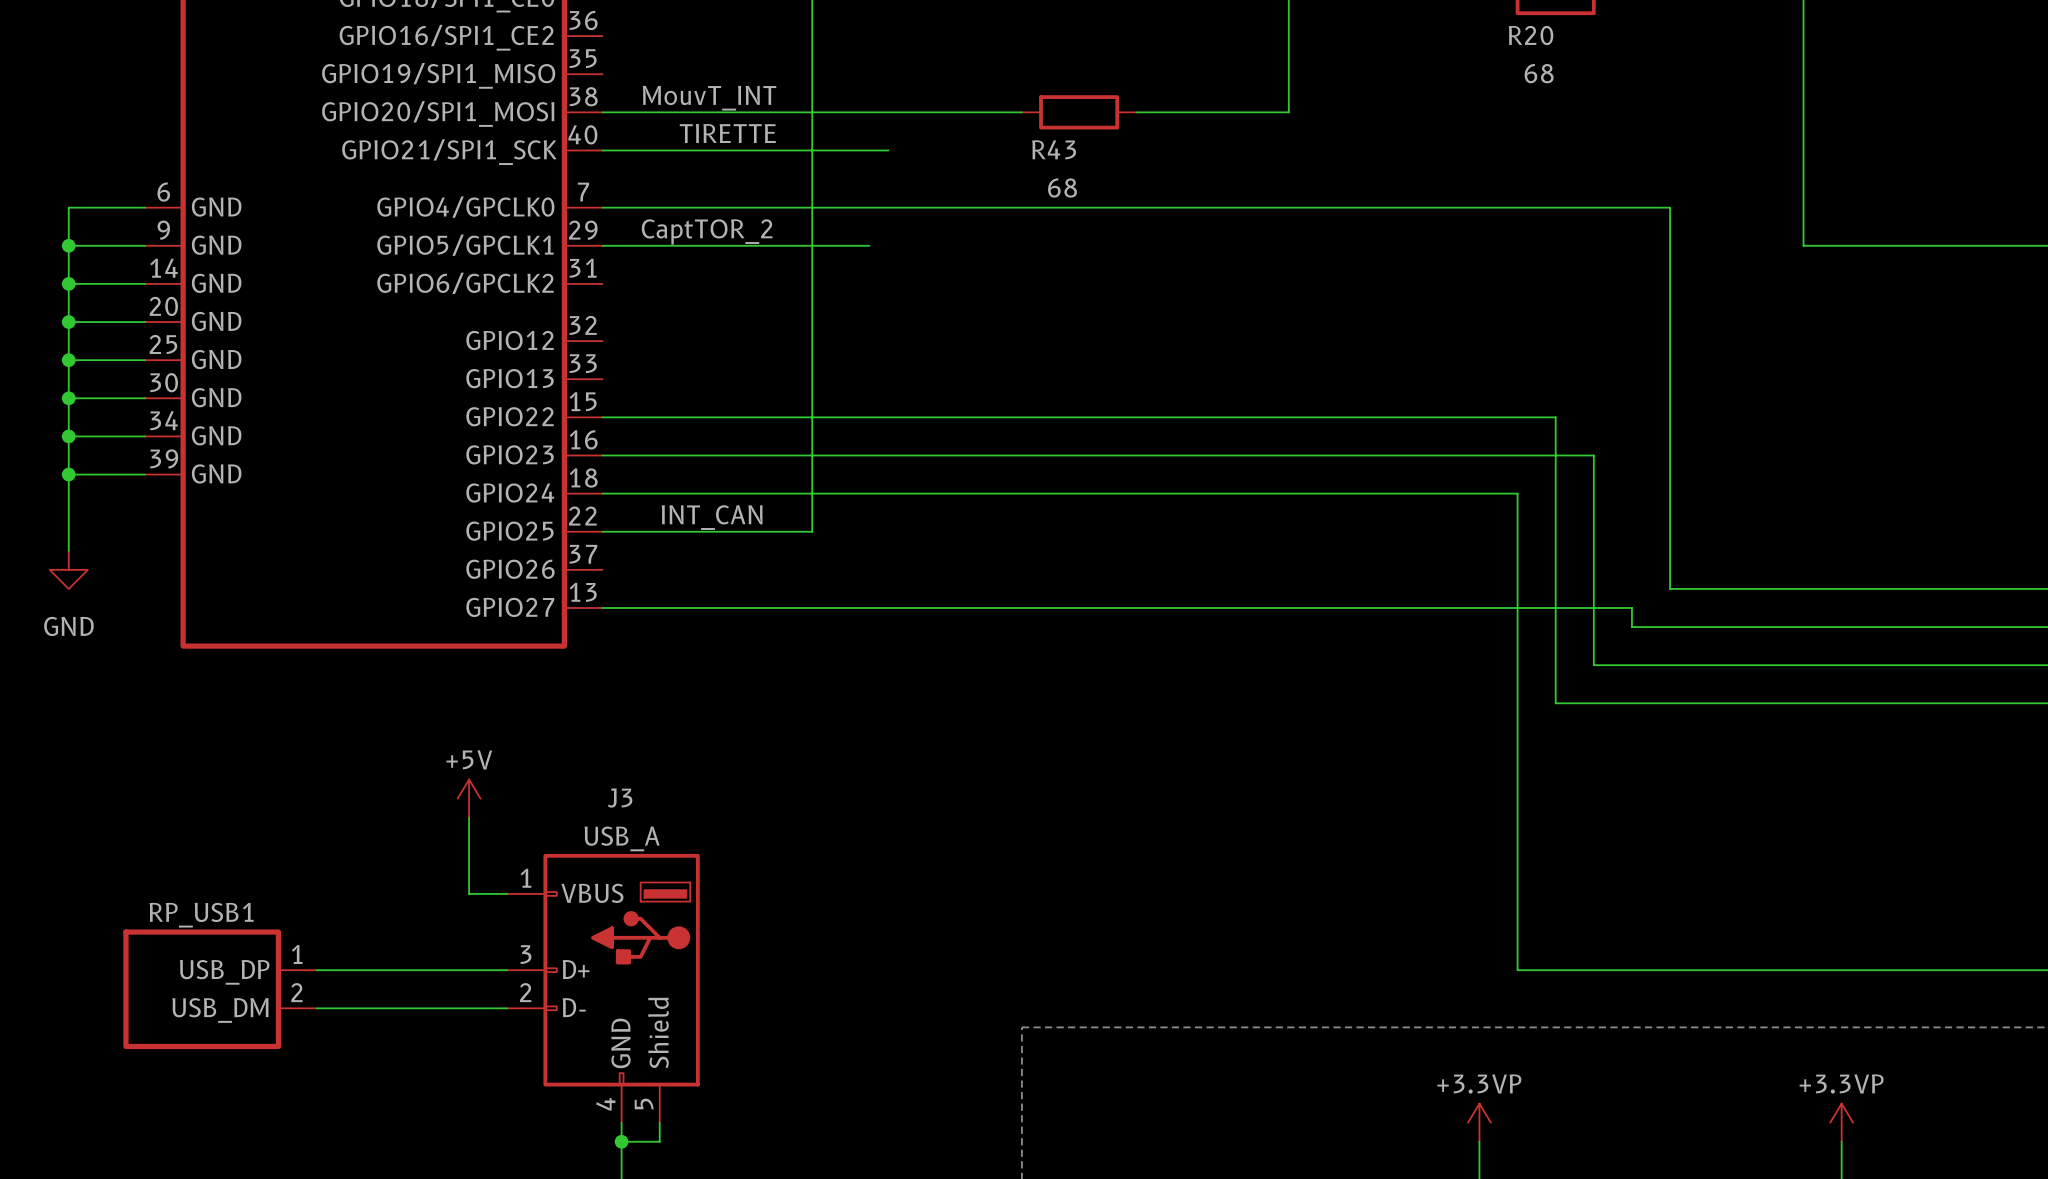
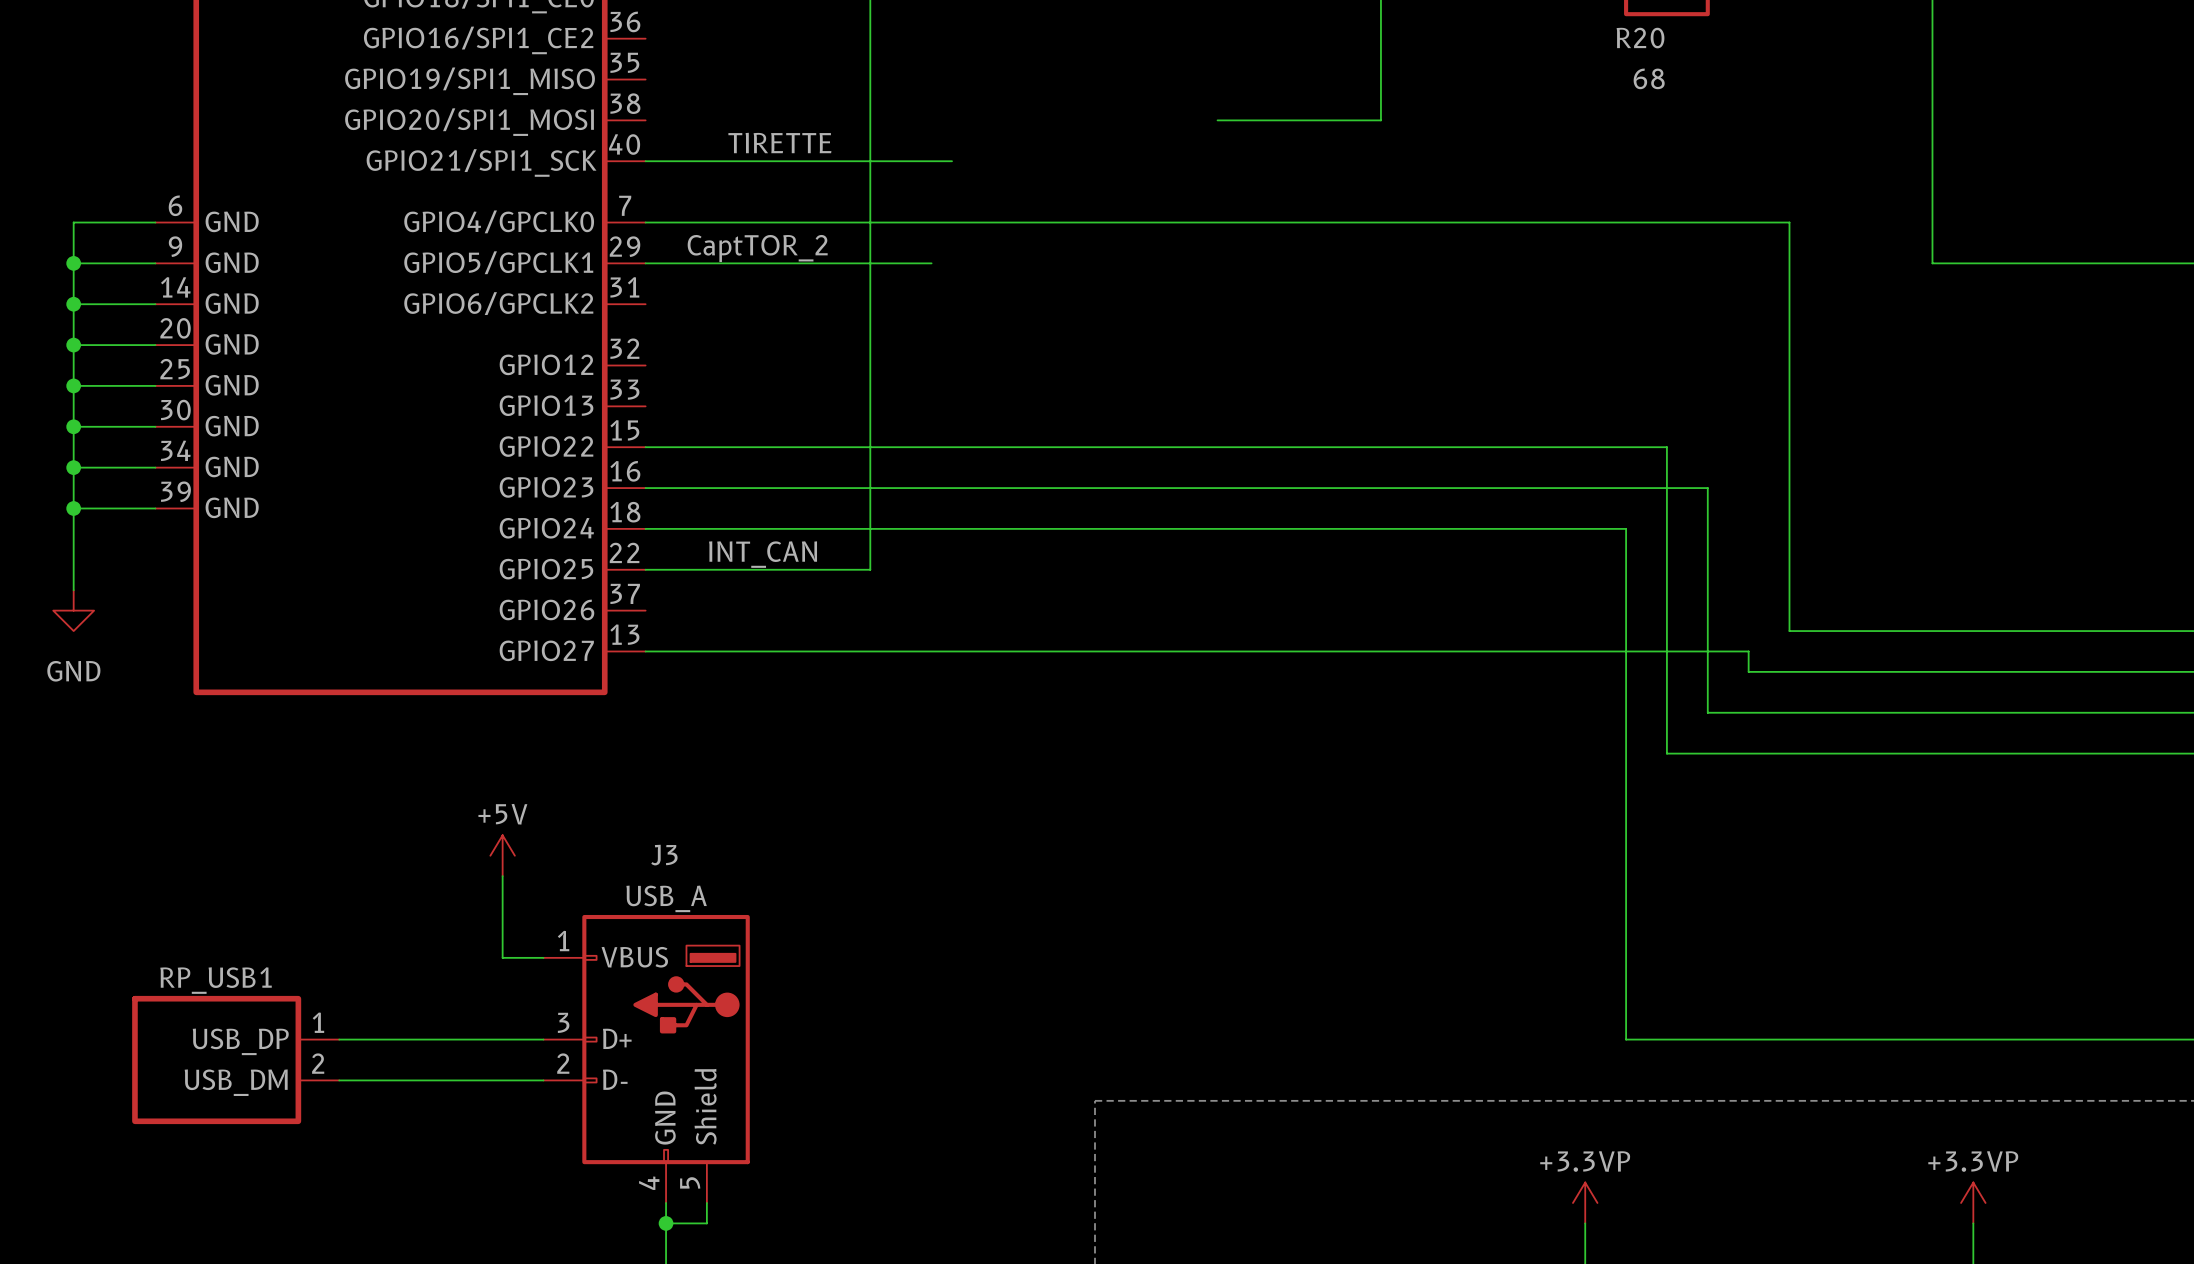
label: MouvT_INT (709, 98) -> none
wire: (602, 112) (1021, 112) -> none
R43: 68 (1079, 112) -> none

